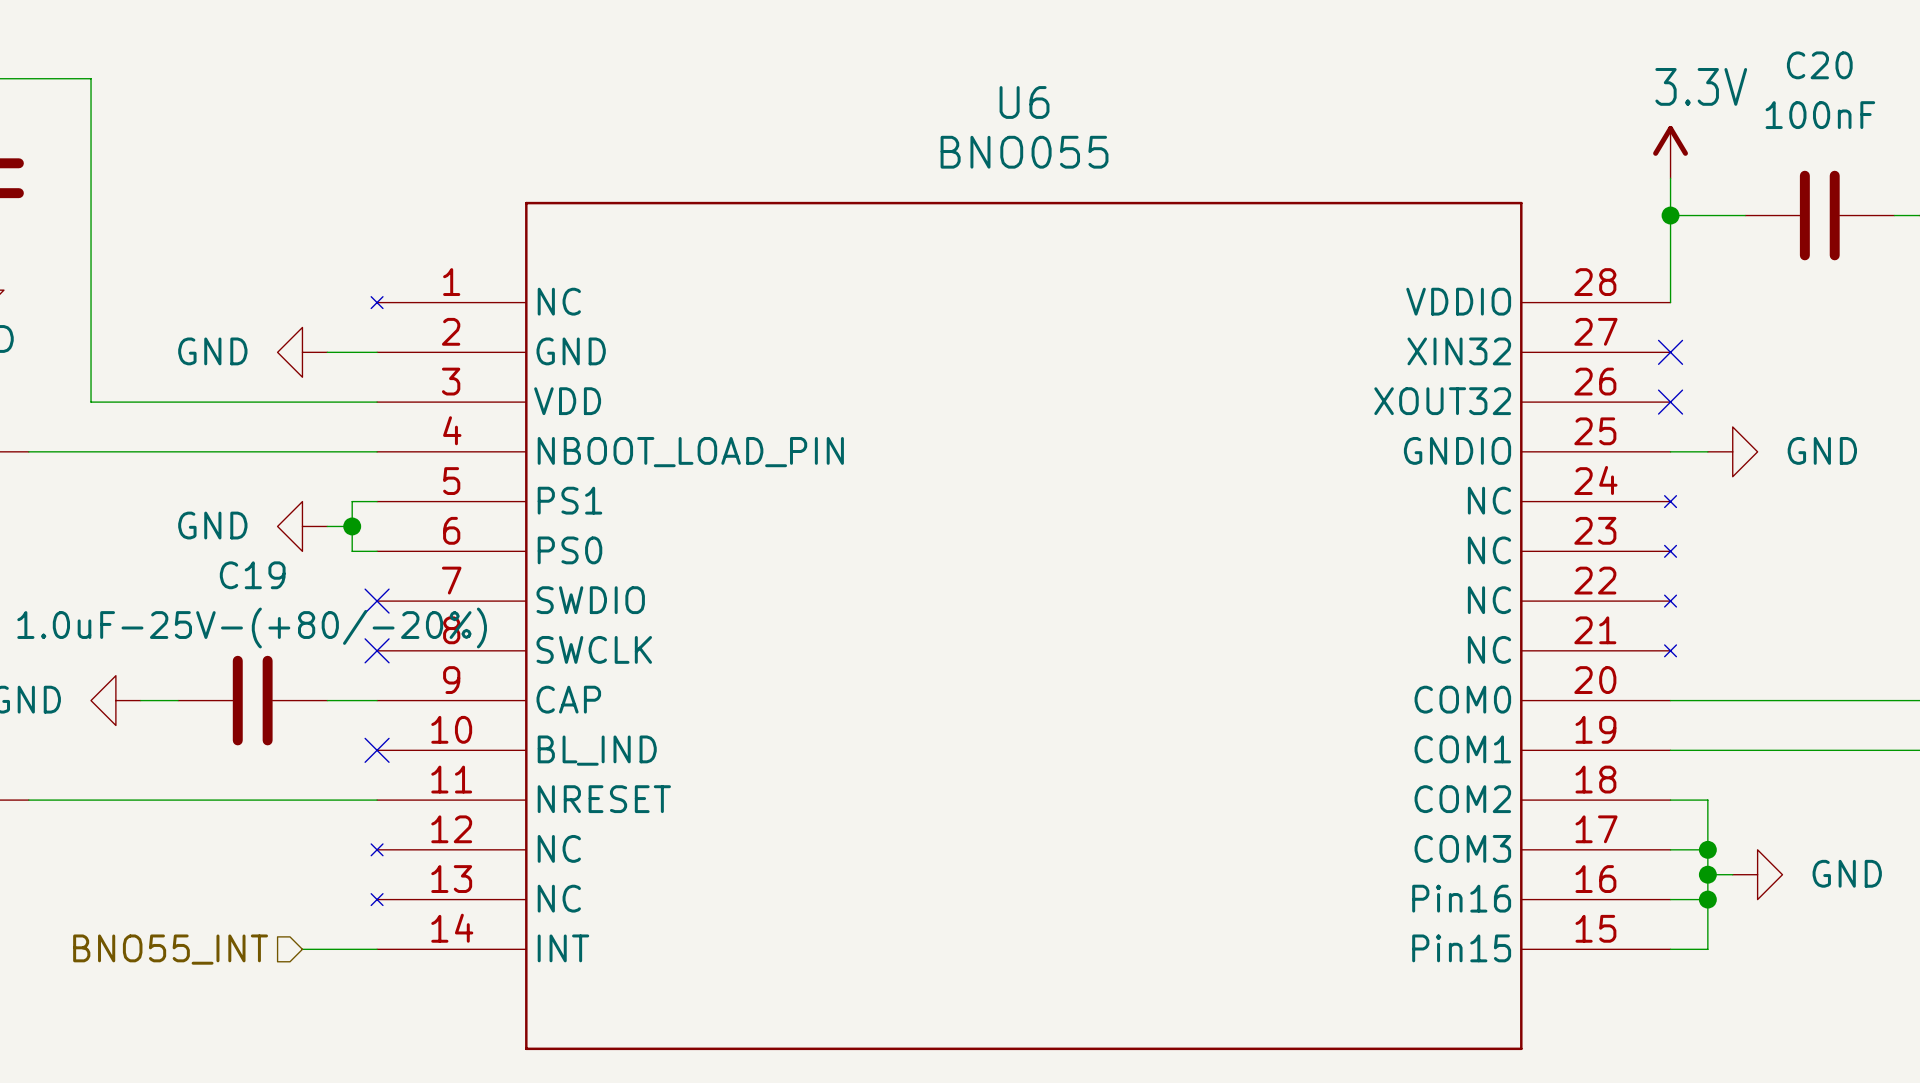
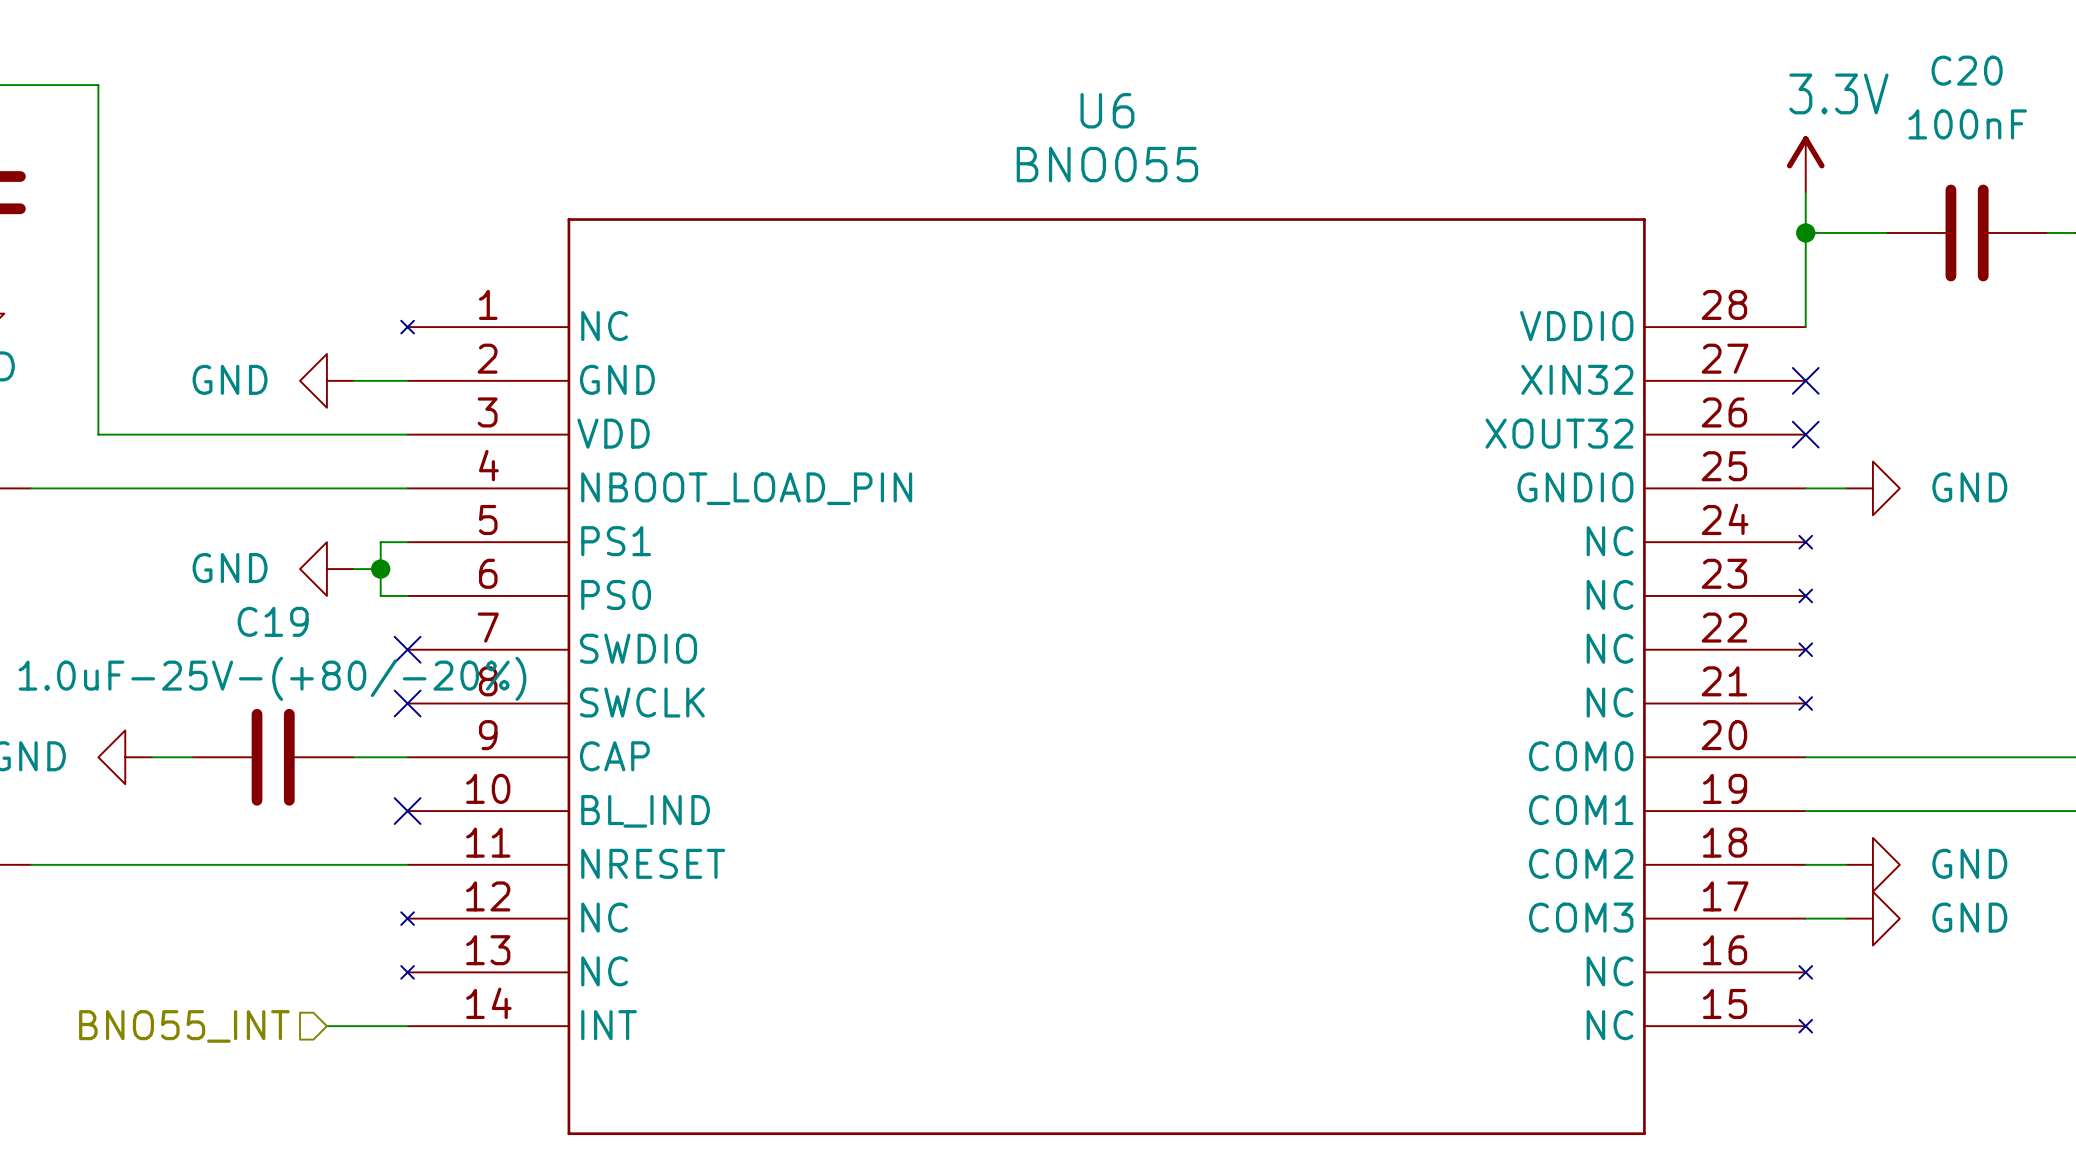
U6 symbol: [371, 201, 1677, 1051] -> [401, 218, 1813, 1136]
wire: (1707, 800) (1707, 949) (1670, 949) -> none
power symbol: none -> GND (1872, 864)
junction: (1707, 849) -> none
wire: (1707, 874) (1732, 874) -> none
junction: (1707, 874) -> none
power symbol position: GND (1757, 874) -> GND (1872, 918)
wire: (1670, 899) (1707, 899) -> none
junction: (1707, 899) -> none

